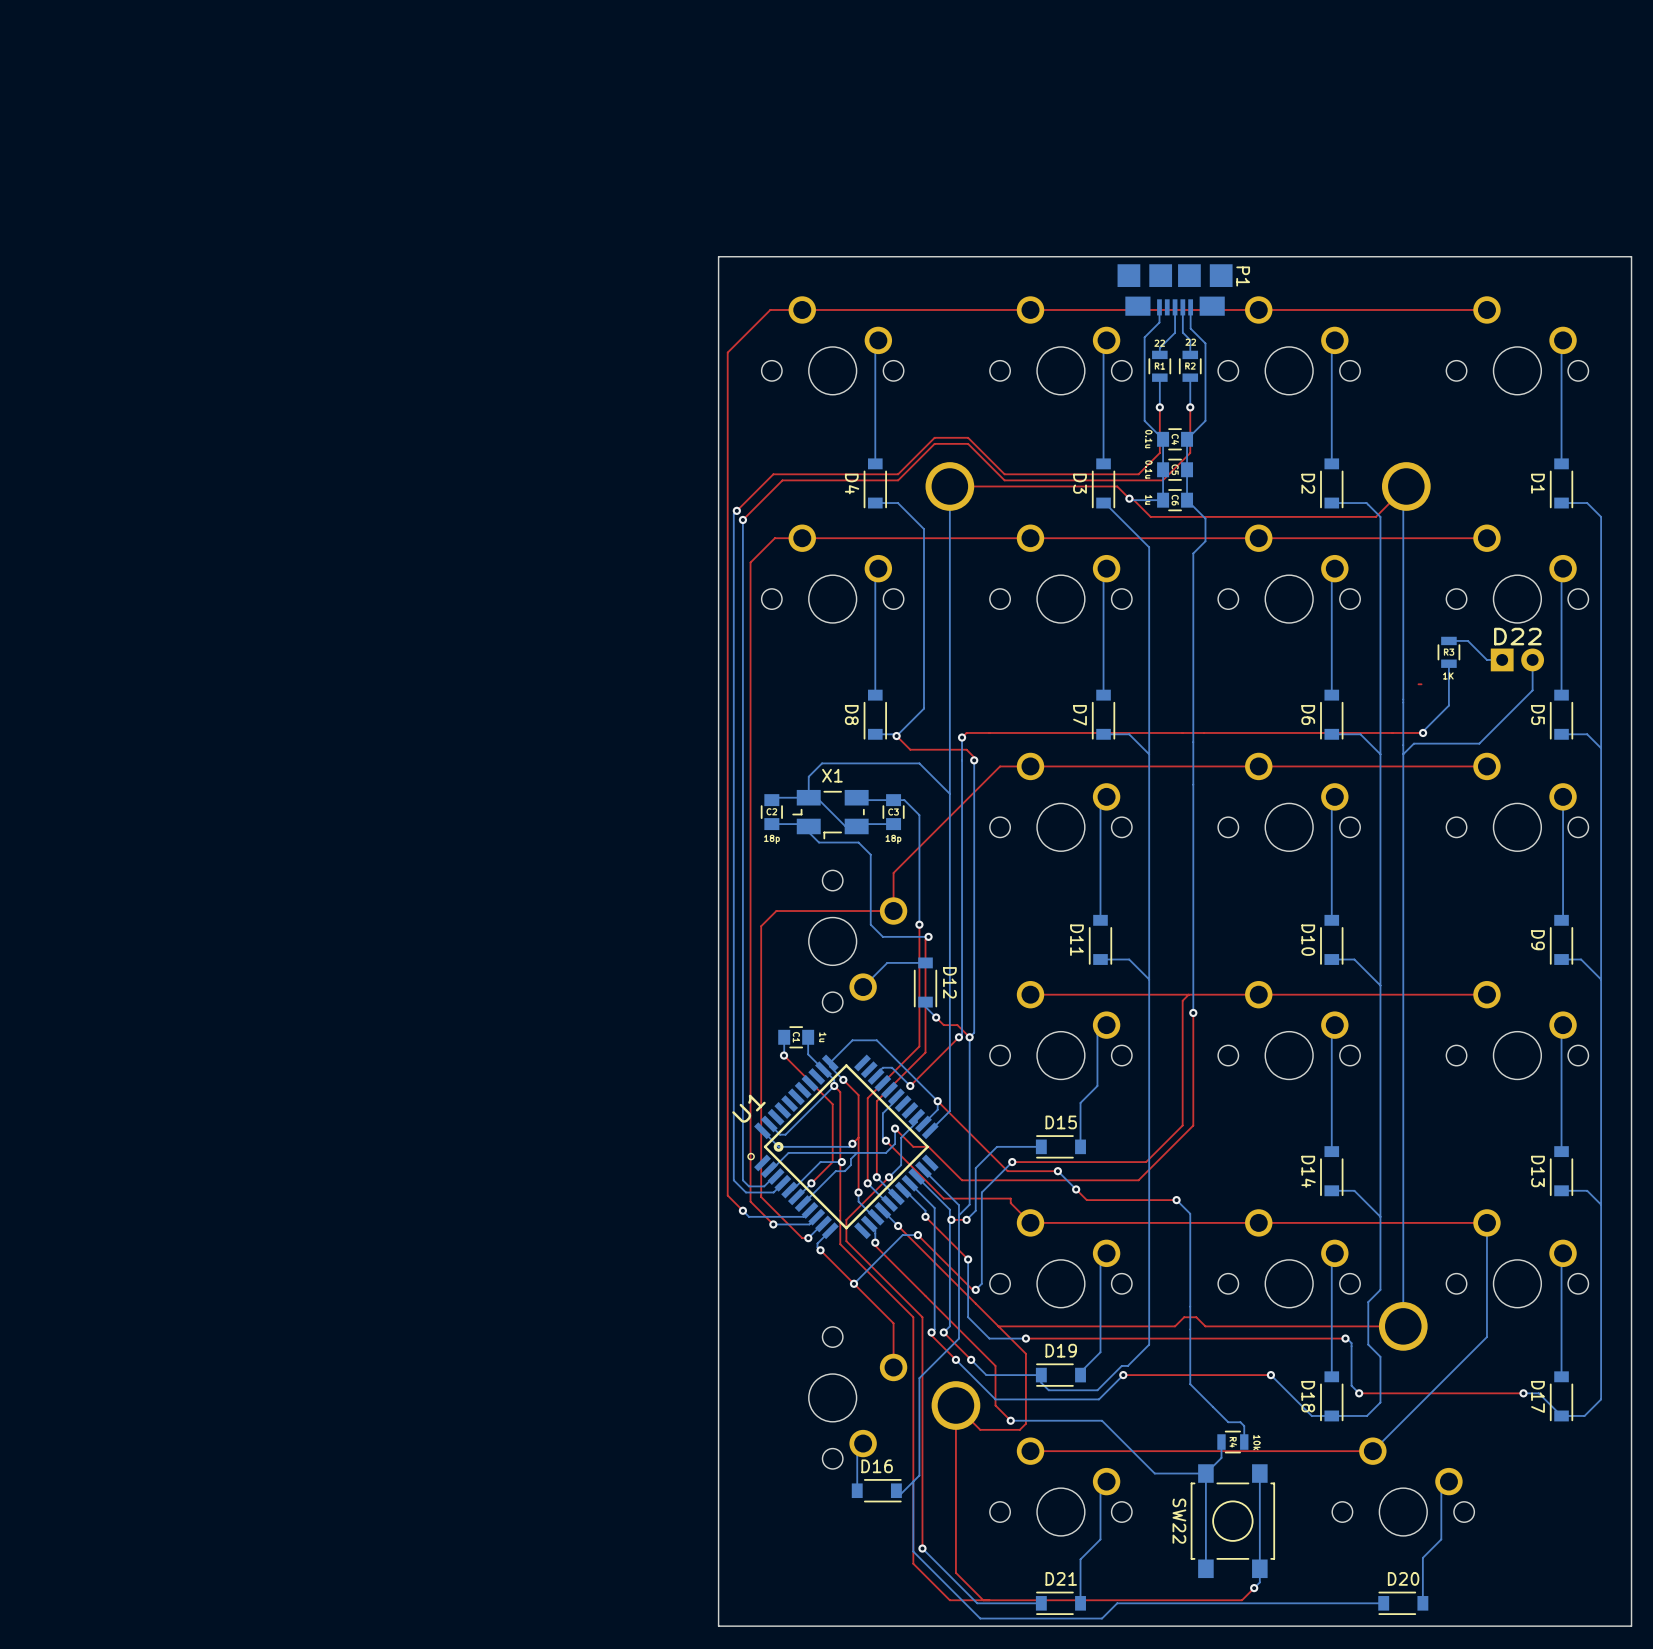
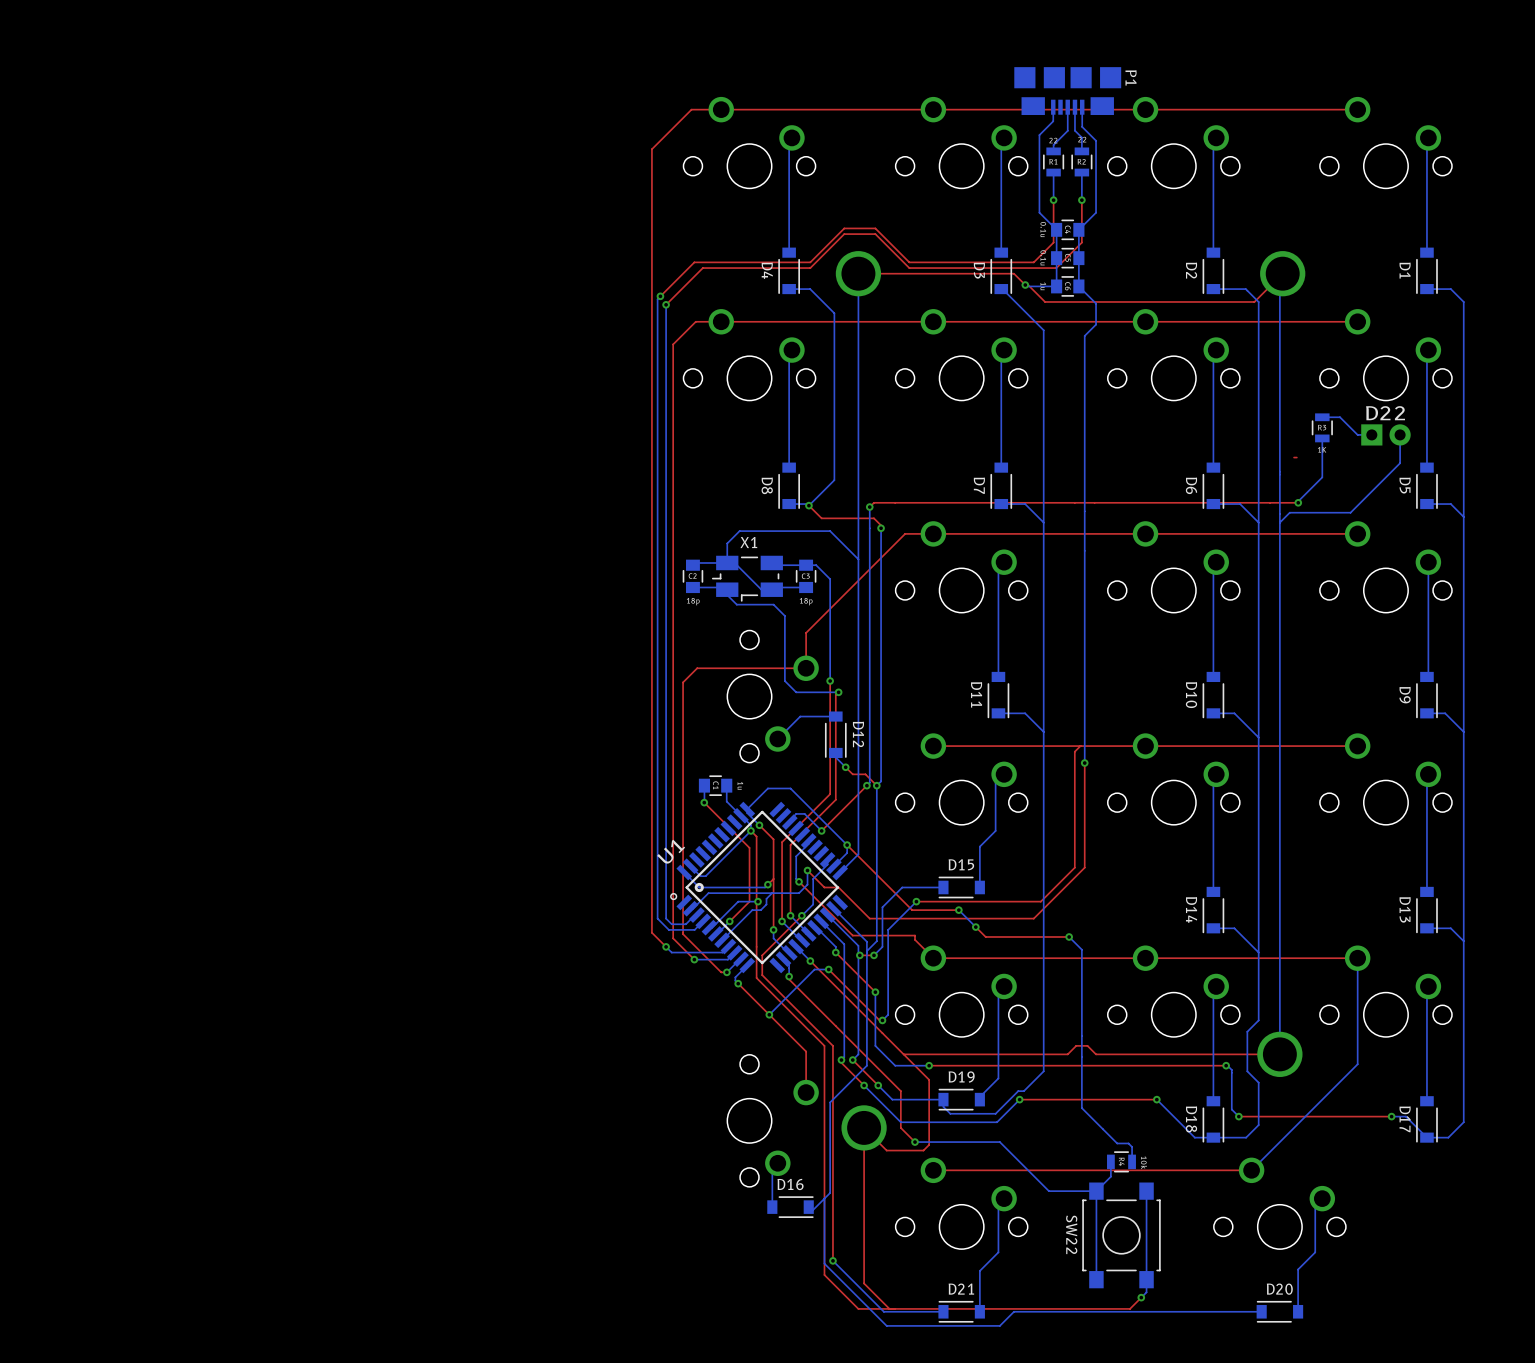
board edge: (1631, 256) (1631, 1626) (718, 1626) (718, 256) (1631, 256) -> none

